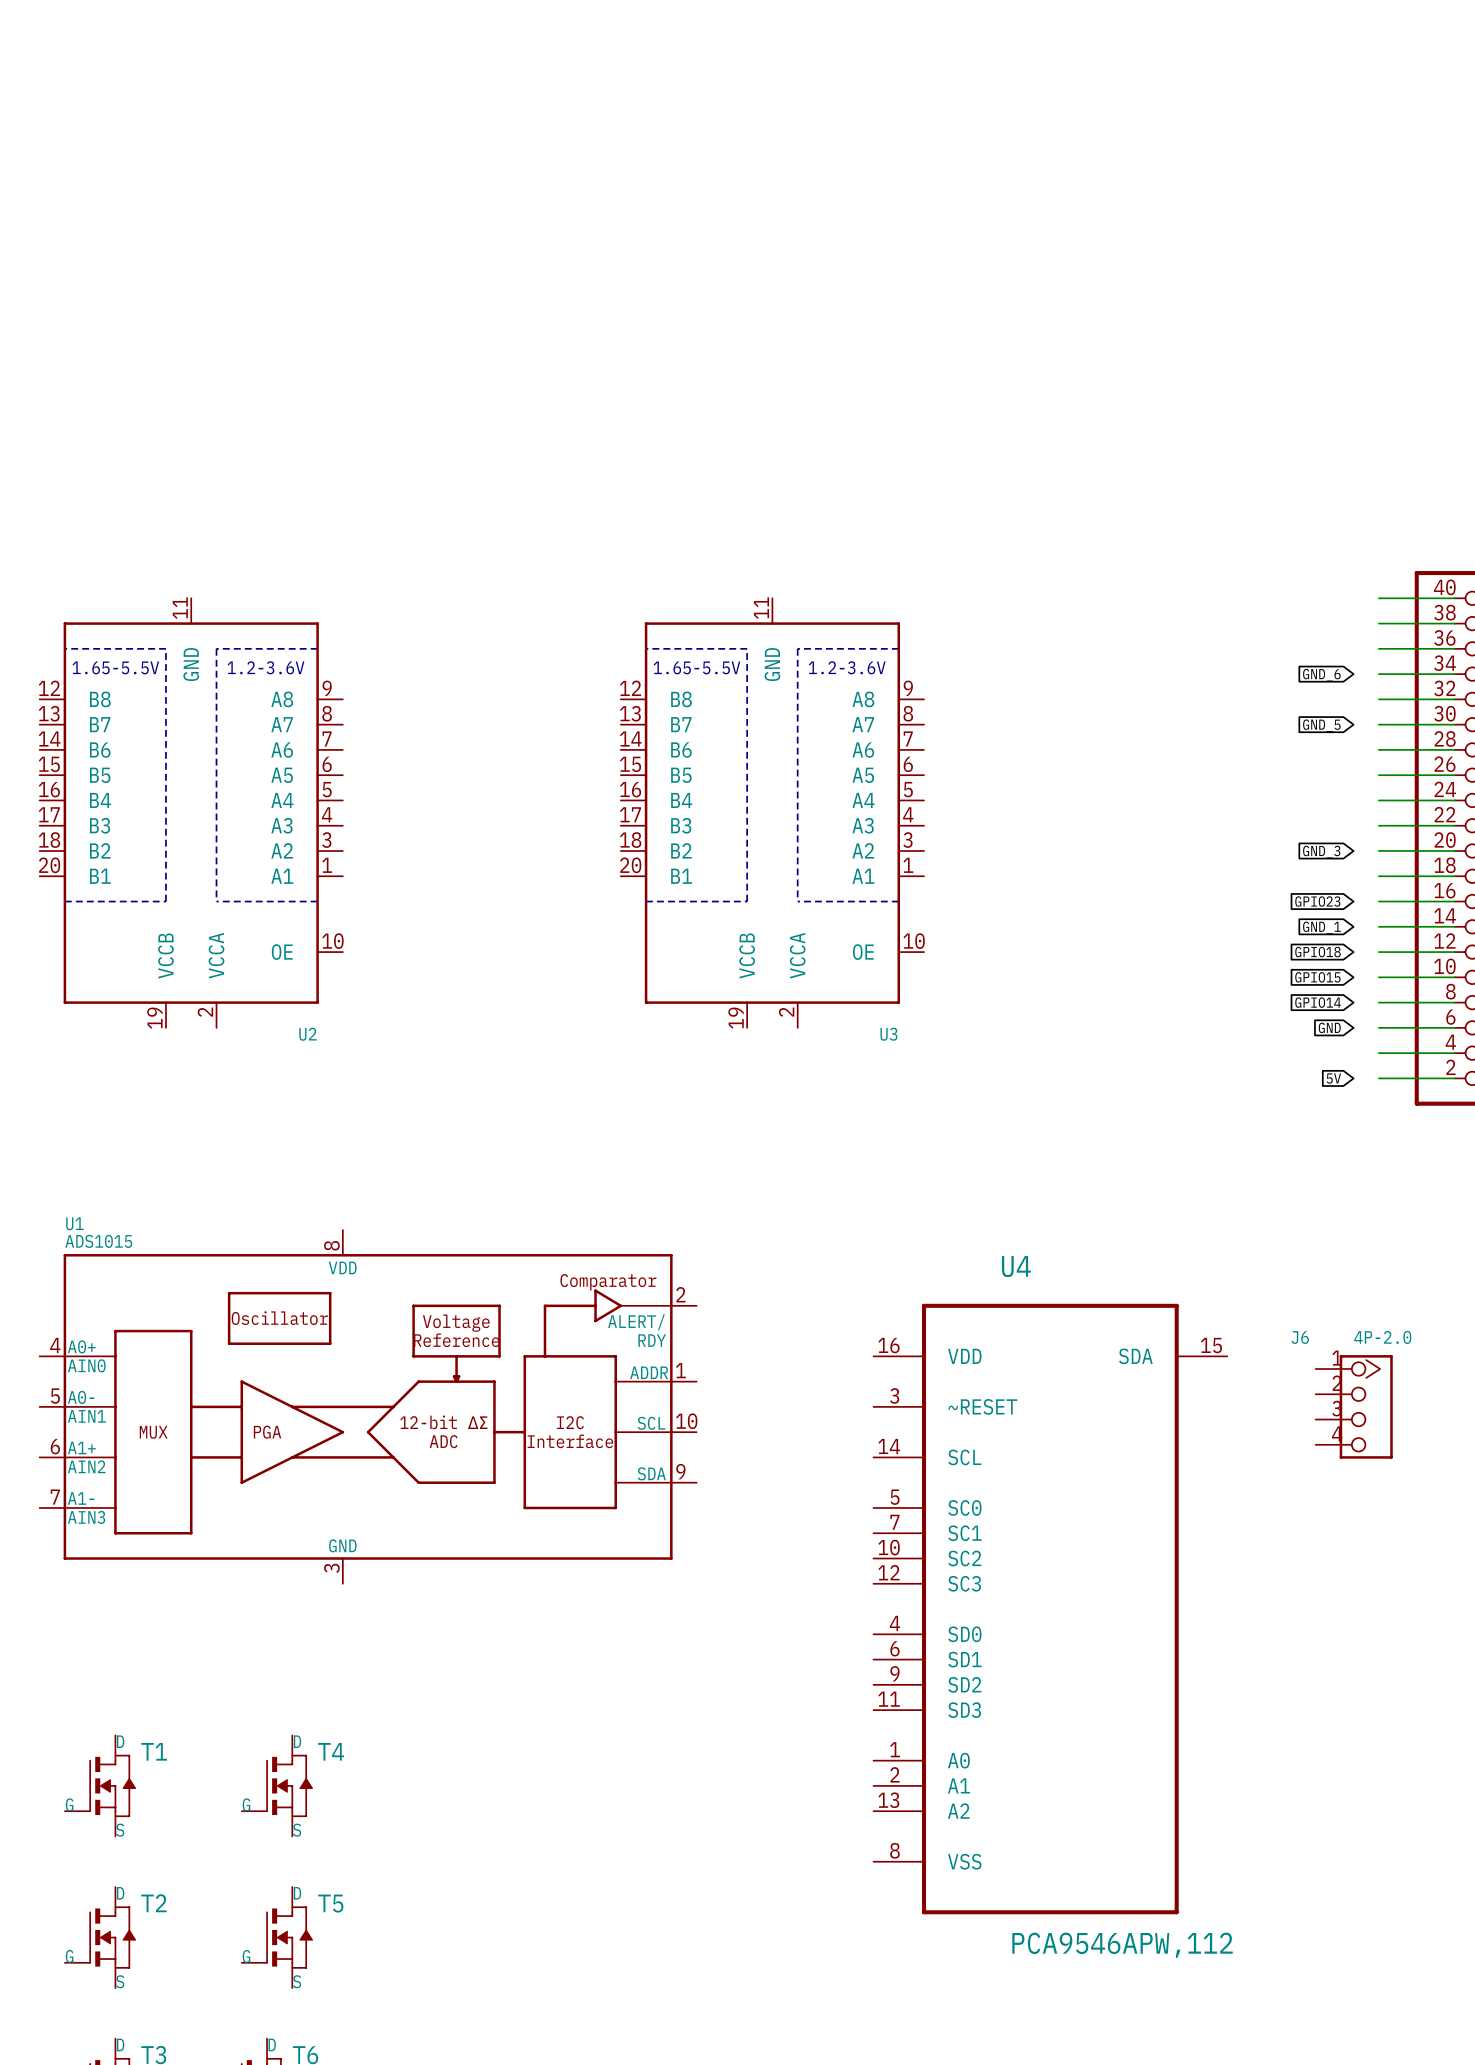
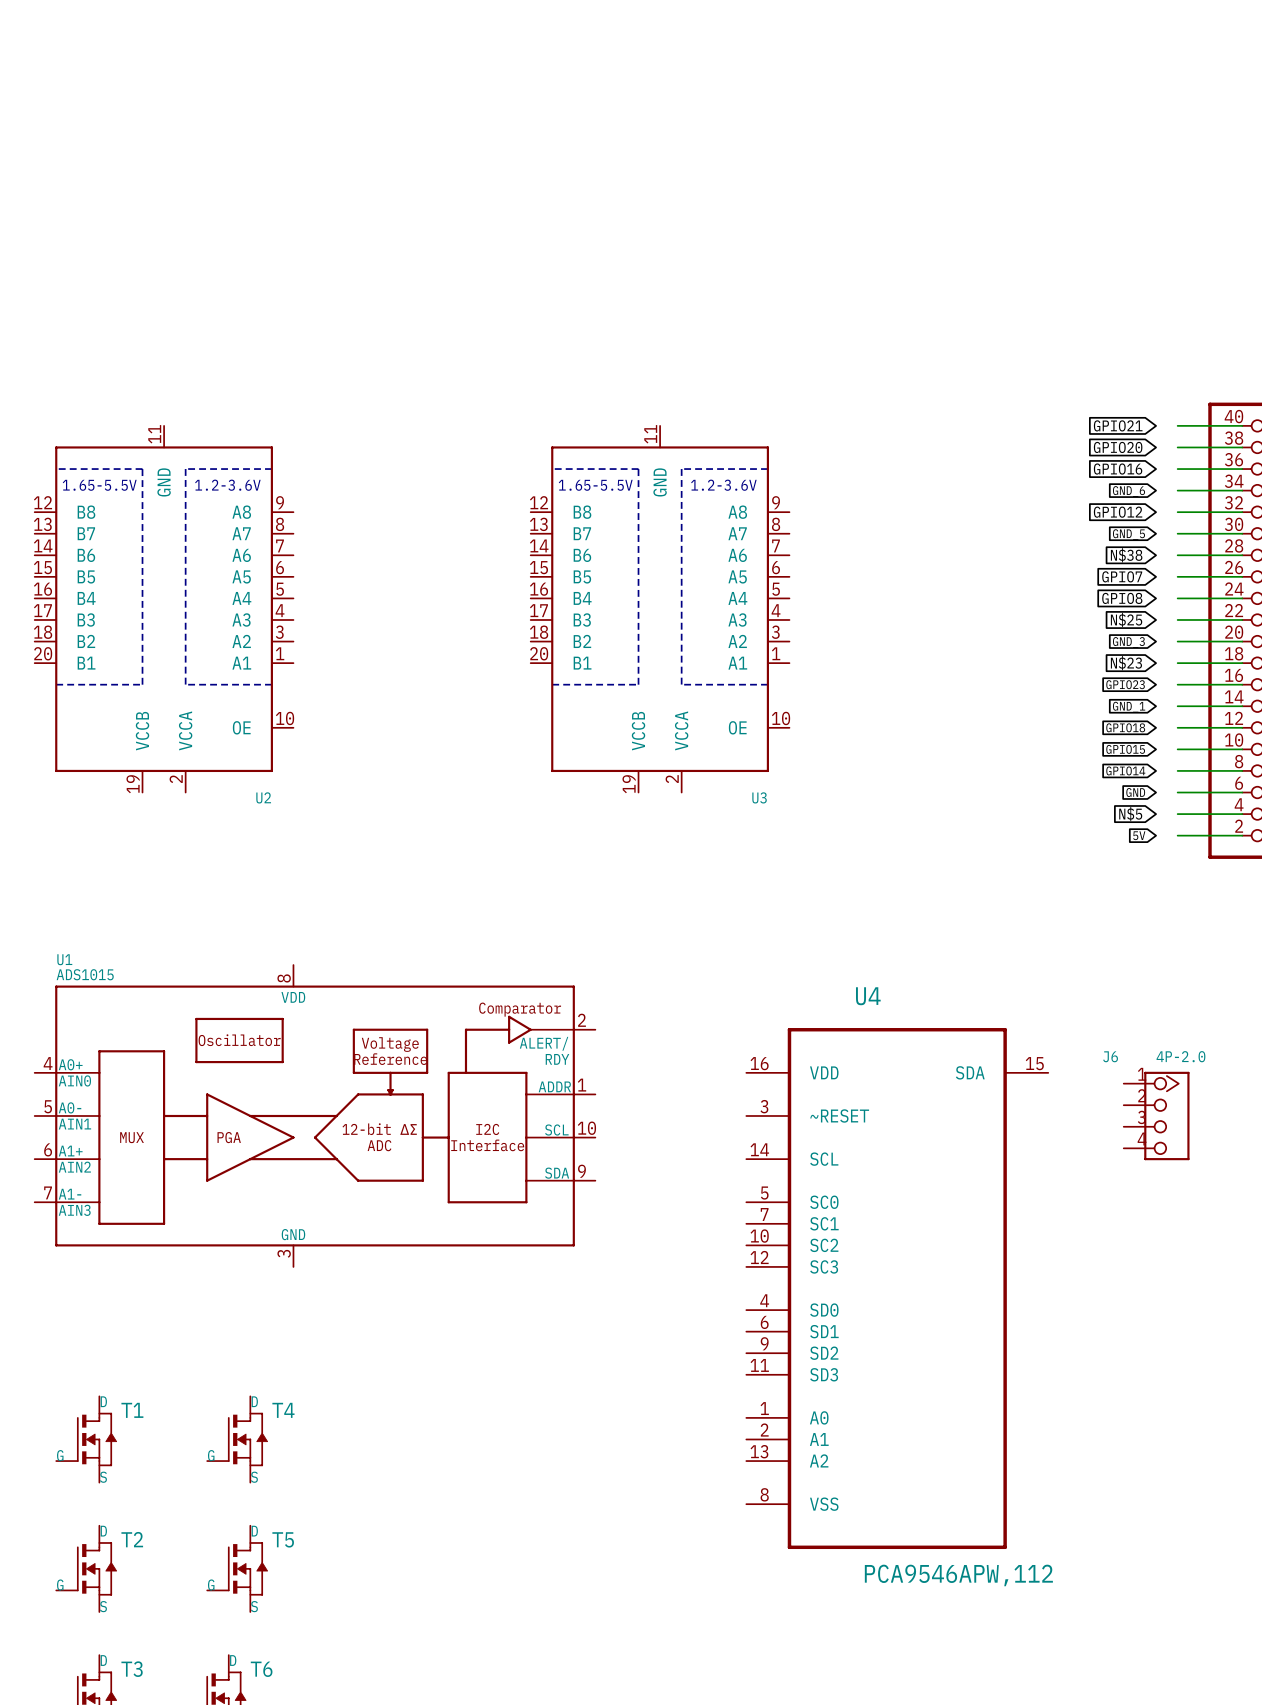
global label: none -> GPIO21 (1118, 425)
global label: none -> GPIO20 (1118, 447)
global label: none -> GPIO16 (1118, 469)
global label: none -> GPIO12 (1118, 512)
global label: none -> N$38 (1126, 555)
global label: none -> GPIO7 (1122, 576)
global label: none -> GPIO8 (1122, 598)
global label: none -> N$25 (1126, 619)
global label: none -> N$23 (1126, 663)
global label: none -> N$5 (1130, 814)

